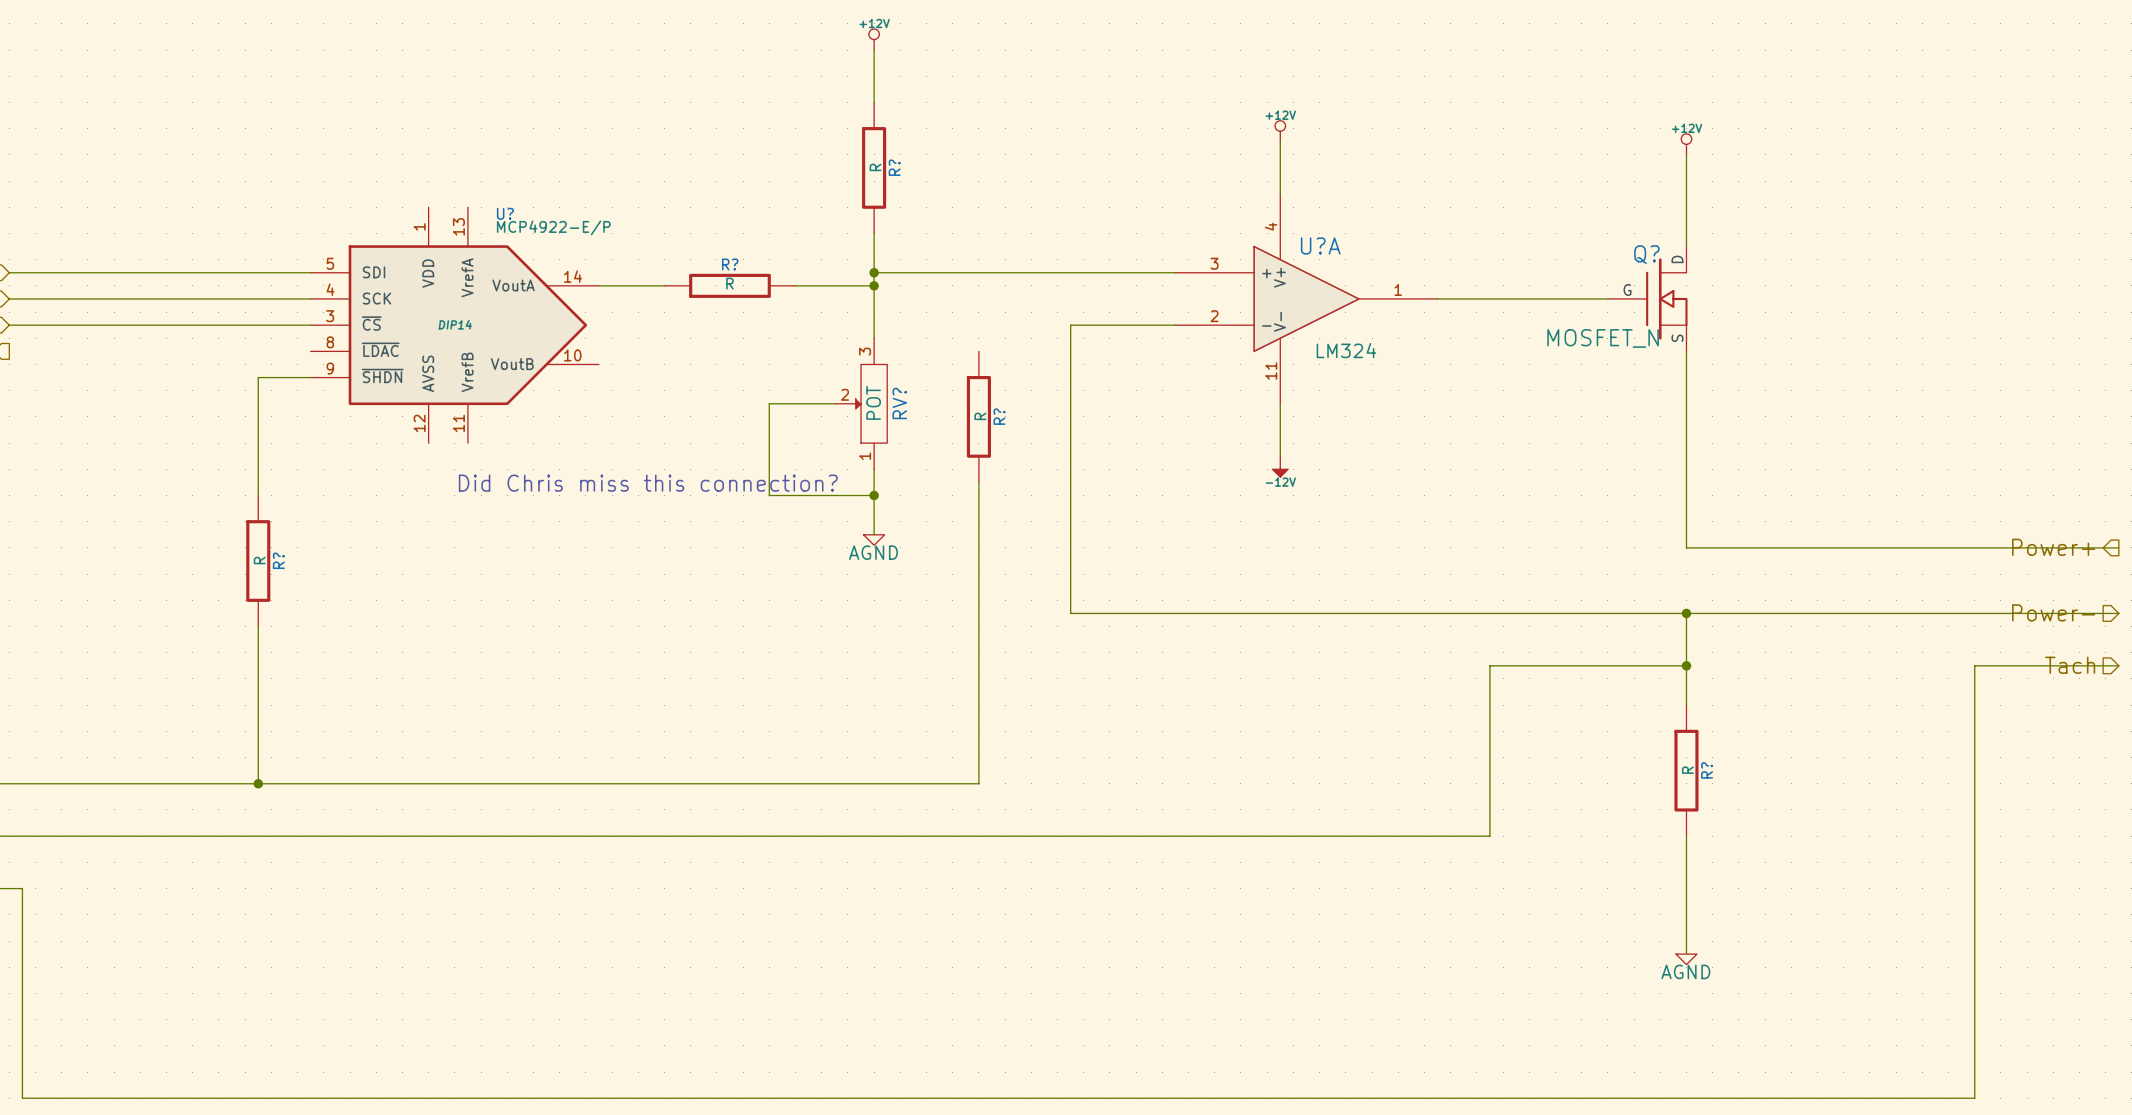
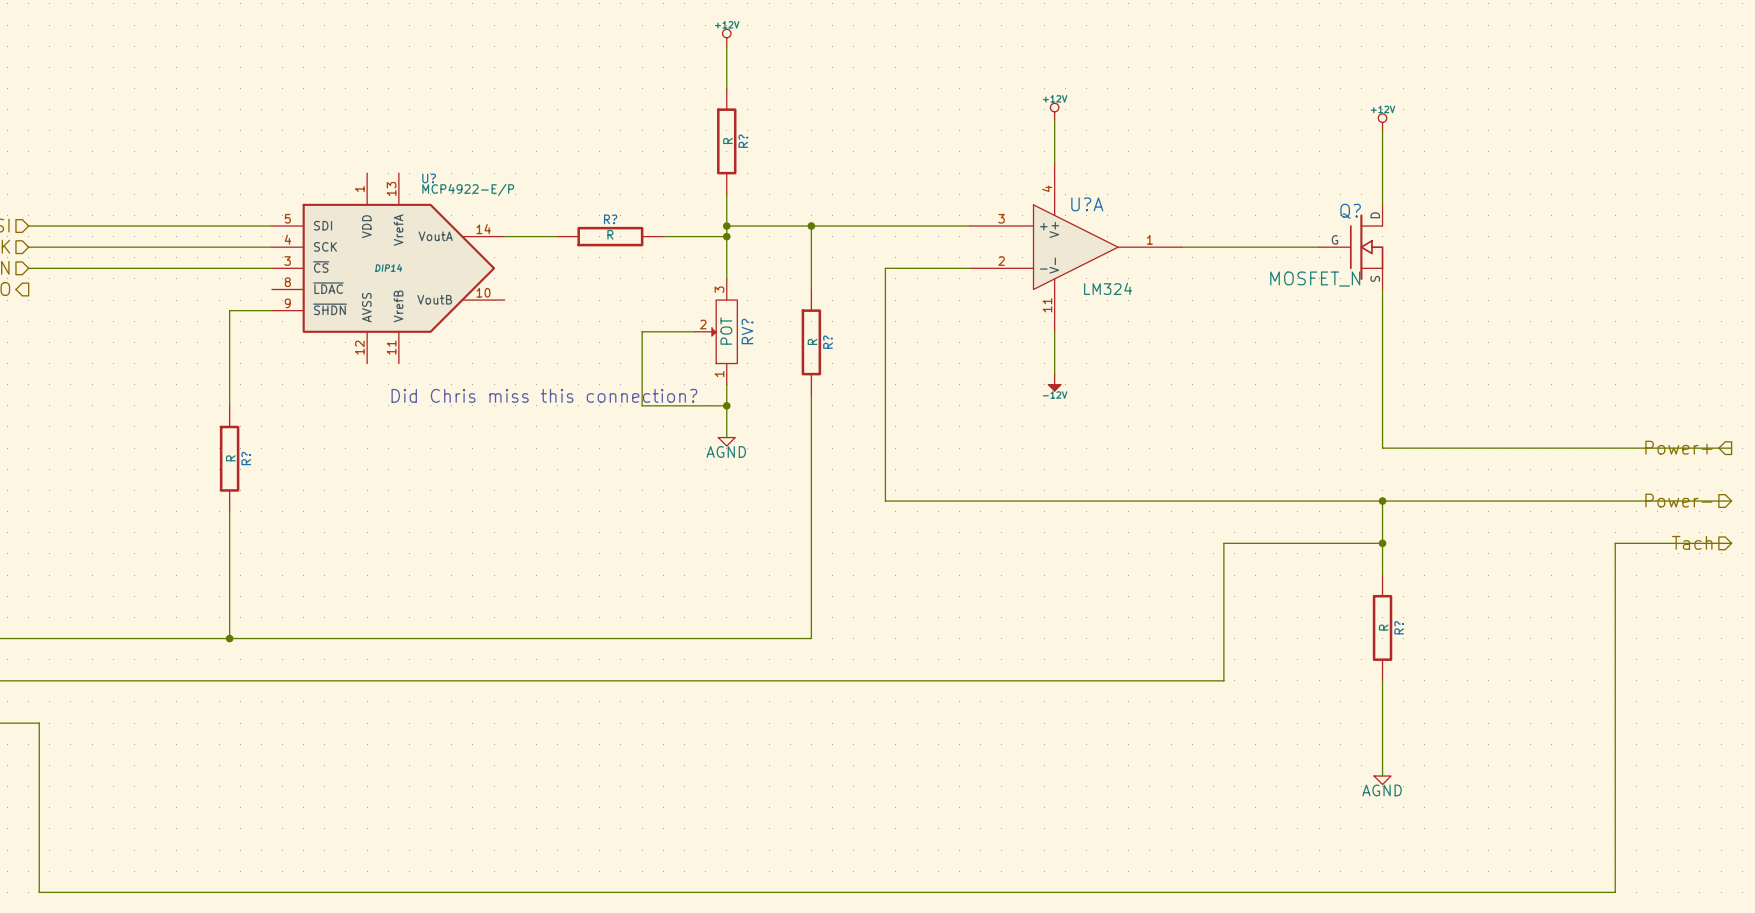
wire: none -> (811, 226) (811, 289)
junction: none -> (811, 226)

